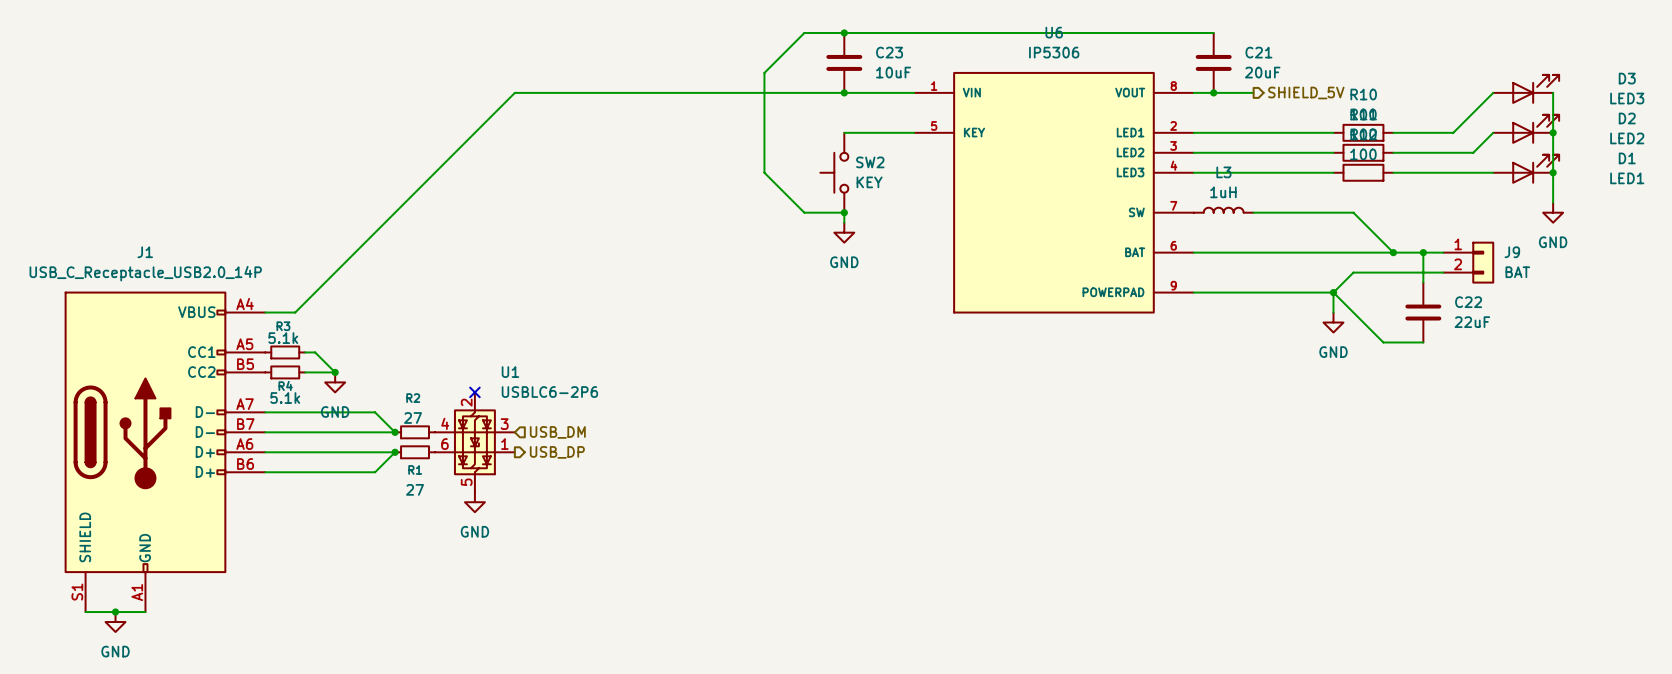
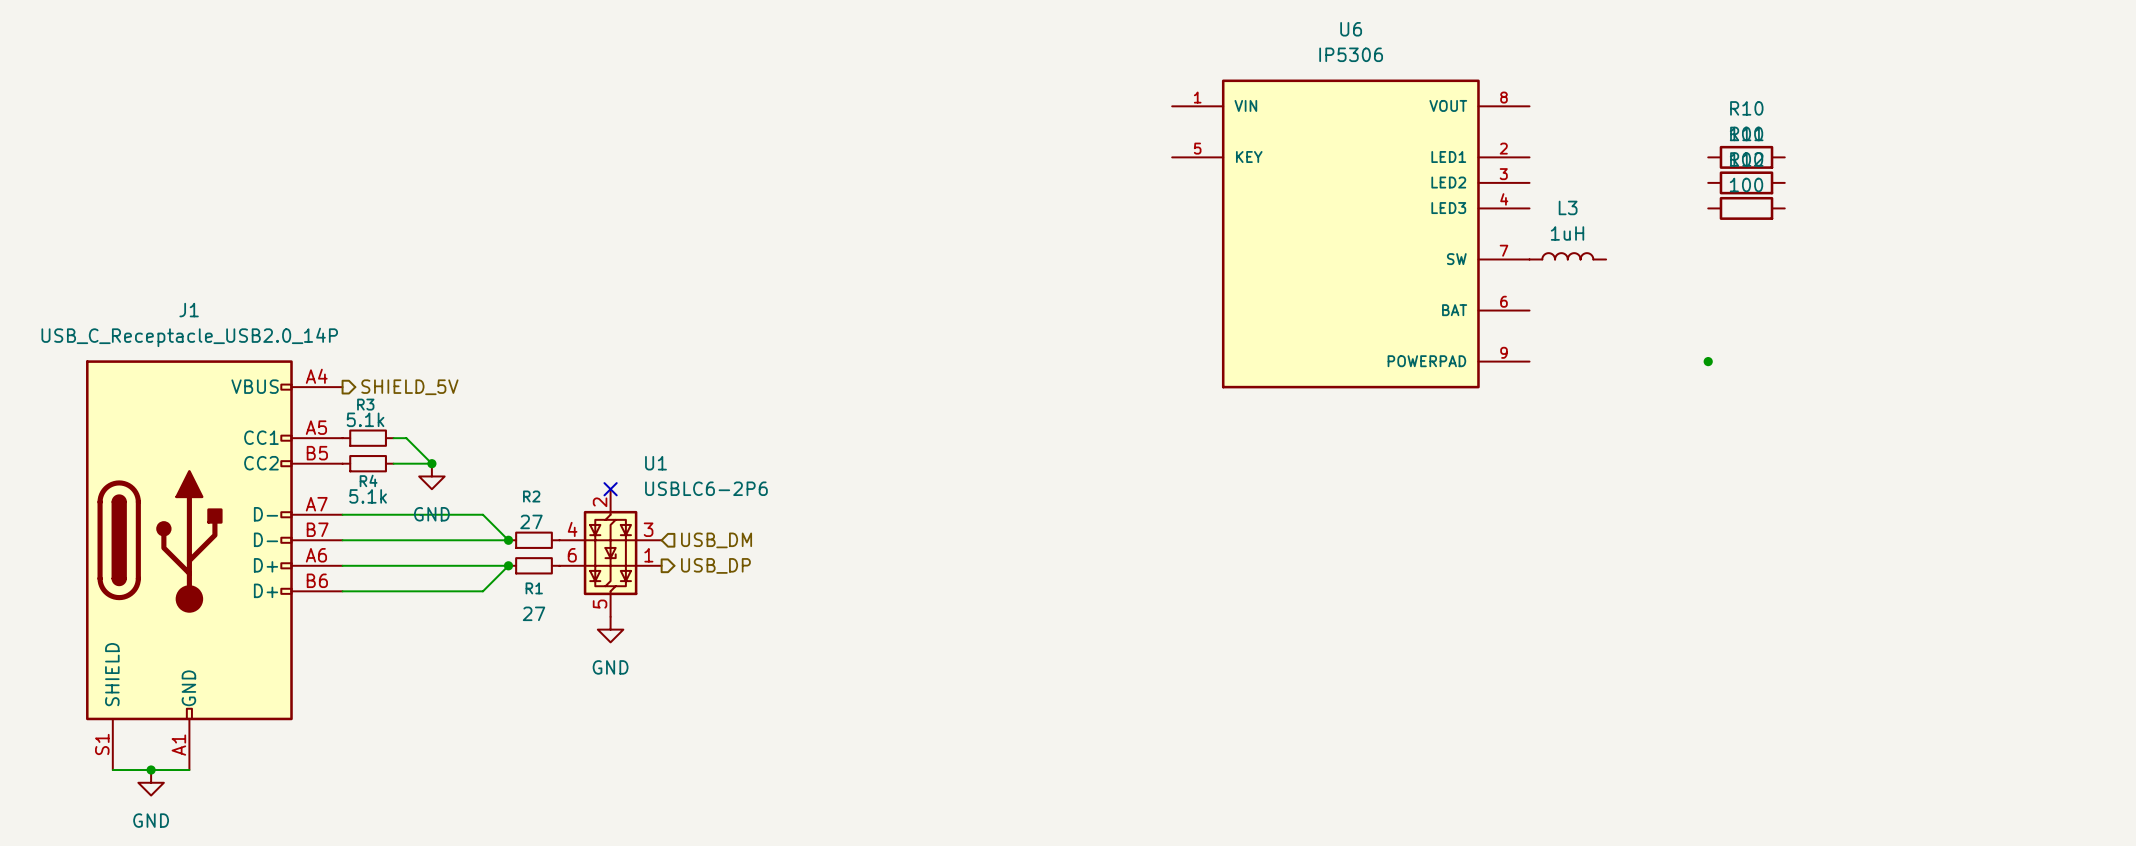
junction: (844, 32) -> none
wire: (1213, 32) (804, 32) (764, 72) (764, 172) (804, 212) (844, 212) (844, 222) -> none
C23: 10uF (844, 62) -> none
C21: 20uF (1213, 62) -> none
D3: LED3 (1526, 89) -> none
junction: (844, 92) -> none
wire: (914, 92) (514, 92) (295, 312) (265, 312) -> none
wire: (1193, 92) (1253, 92) -> none
junction: (1213, 92) -> none
wire: (1493, 92) (1453, 132) (1393, 132) -> none
wire: (1553, 92) (1553, 202) -> none
hierarchical label: SHIELD_5V (1306, 93) -> none
D2: LED2 (1526, 129) -> none
wire: (844, 132) (914, 132) -> none
wire: (1193, 132) (1333, 132) -> none
wire: (1493, 132) (1473, 152) (1393, 152) -> none
junction: (1553, 132) -> none
wire: (1193, 152) (1333, 152) -> none
D1: LED1 (1526, 169) -> none
SW2: KEY (834, 172) -> none
wire: (1193, 172) (1333, 172) -> none
wire: (1393, 172) (1493, 172) -> none
junction: (1553, 172) -> none
junction: (844, 212) -> none
wire: (1253, 212) (1353, 212) (1393, 252) -> none
power symbol: GND (1553, 212) -> none
power symbol: GND (844, 232) -> none
wire: (1193, 252) (1443, 252) -> none
junction: (1393, 252) -> none
wire: (1423, 252) (1423, 282) -> none
junction: (1423, 252) -> none
J9: BAT (1468, 262) -> none
wire: (1443, 272) (1353, 272) (1333, 292) -> none
wire: (1193, 292) (1333, 292) -> none
wire: (1333, 292) (1383, 342) (1423, 342) -> none
wire: (1333, 292) (1333, 312) -> none
hierarchical label: none -> SHIELD_5V (409, 387)
C22: 22uF (1423, 312) -> none
power symbol: GND (1333, 322) -> none

